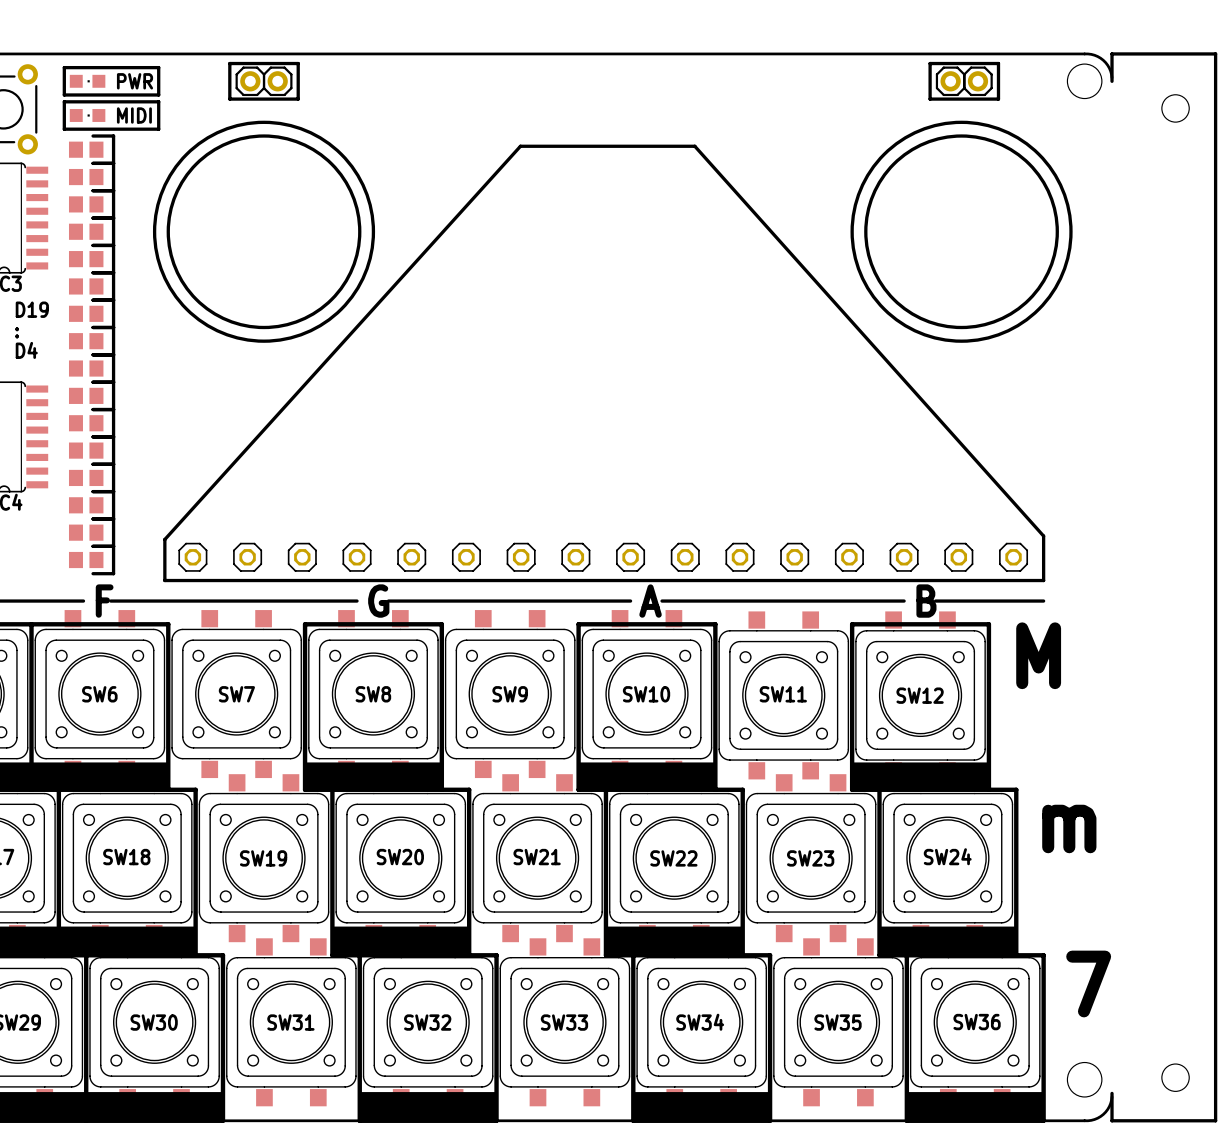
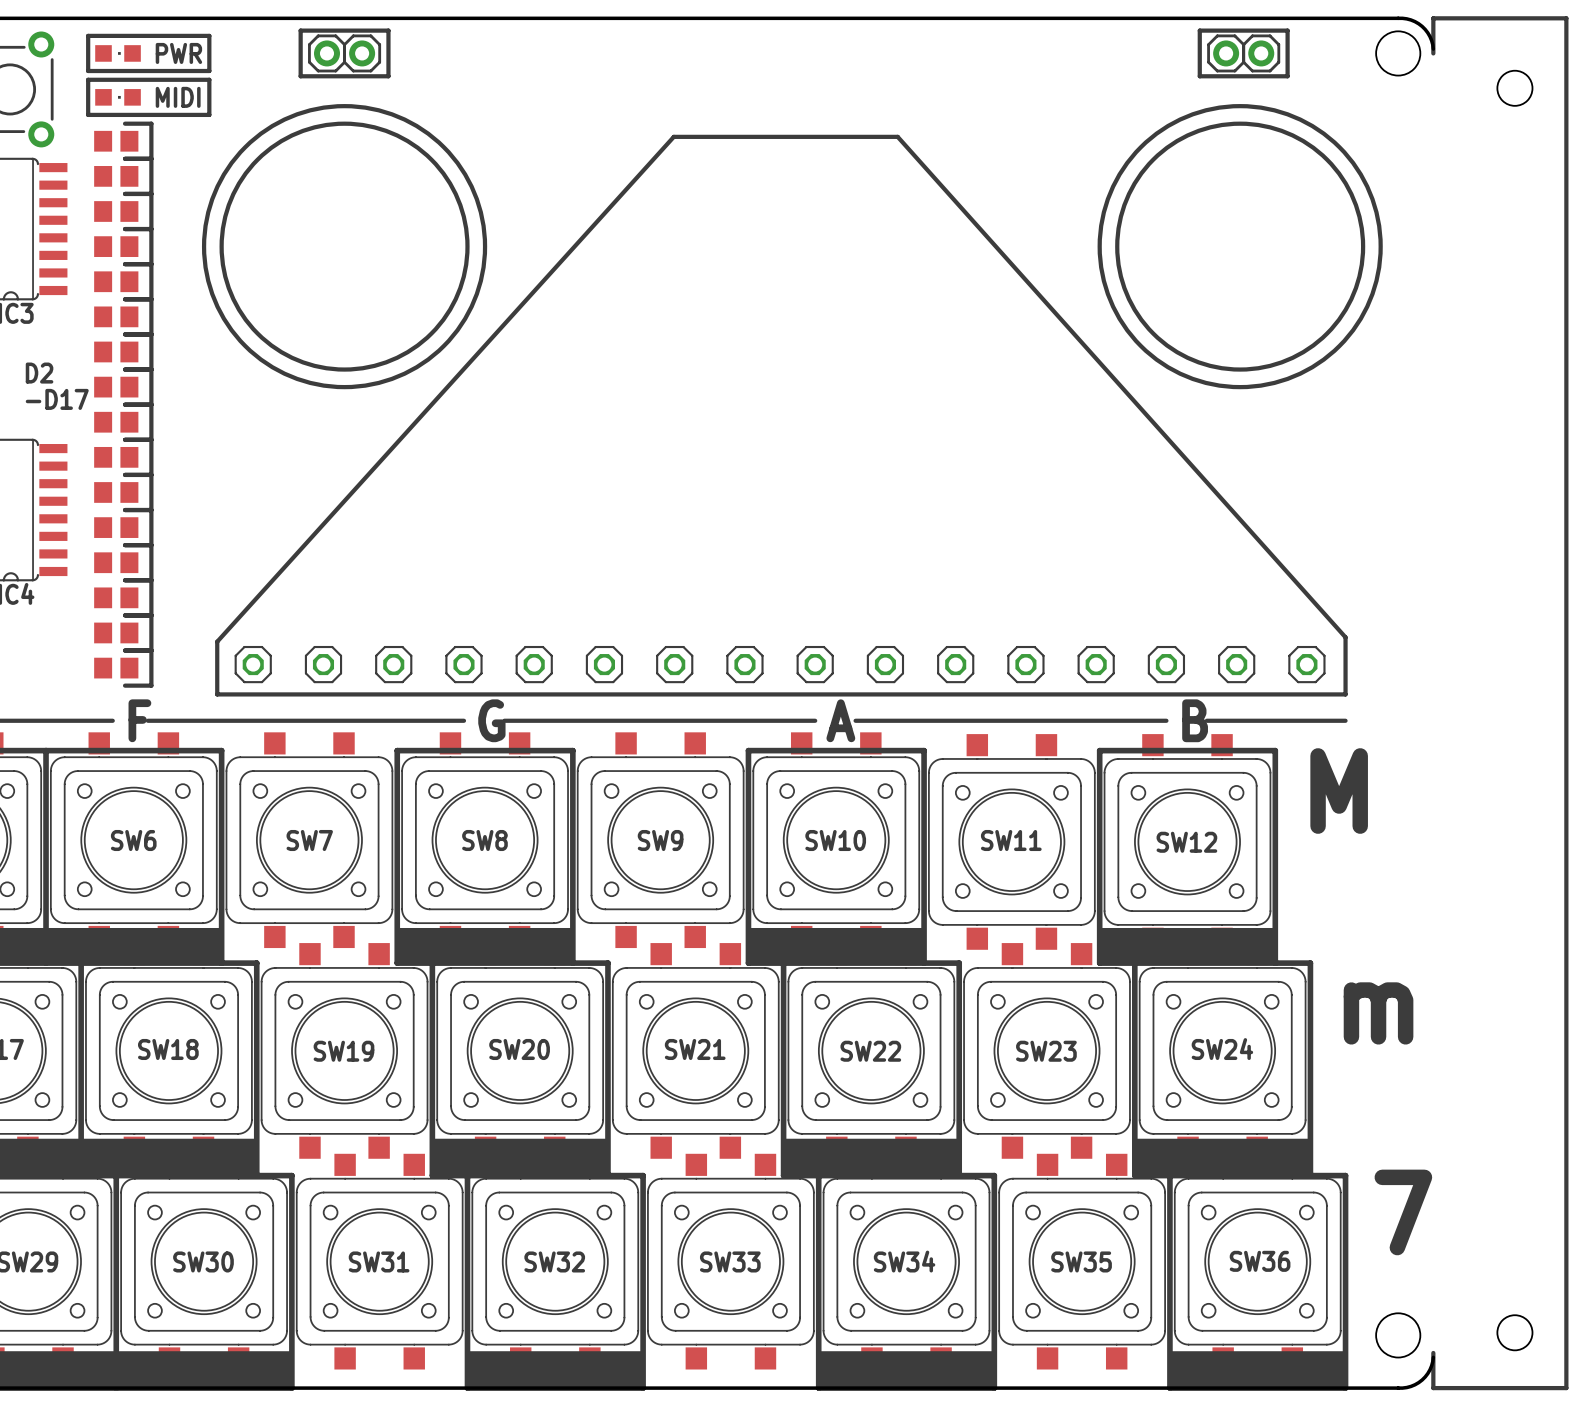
text: D19 (32, 309) -> none
text: : (17, 332) -> D2 (39, 373)
text: D4 (26, 350) -> -D17 (57, 399)

